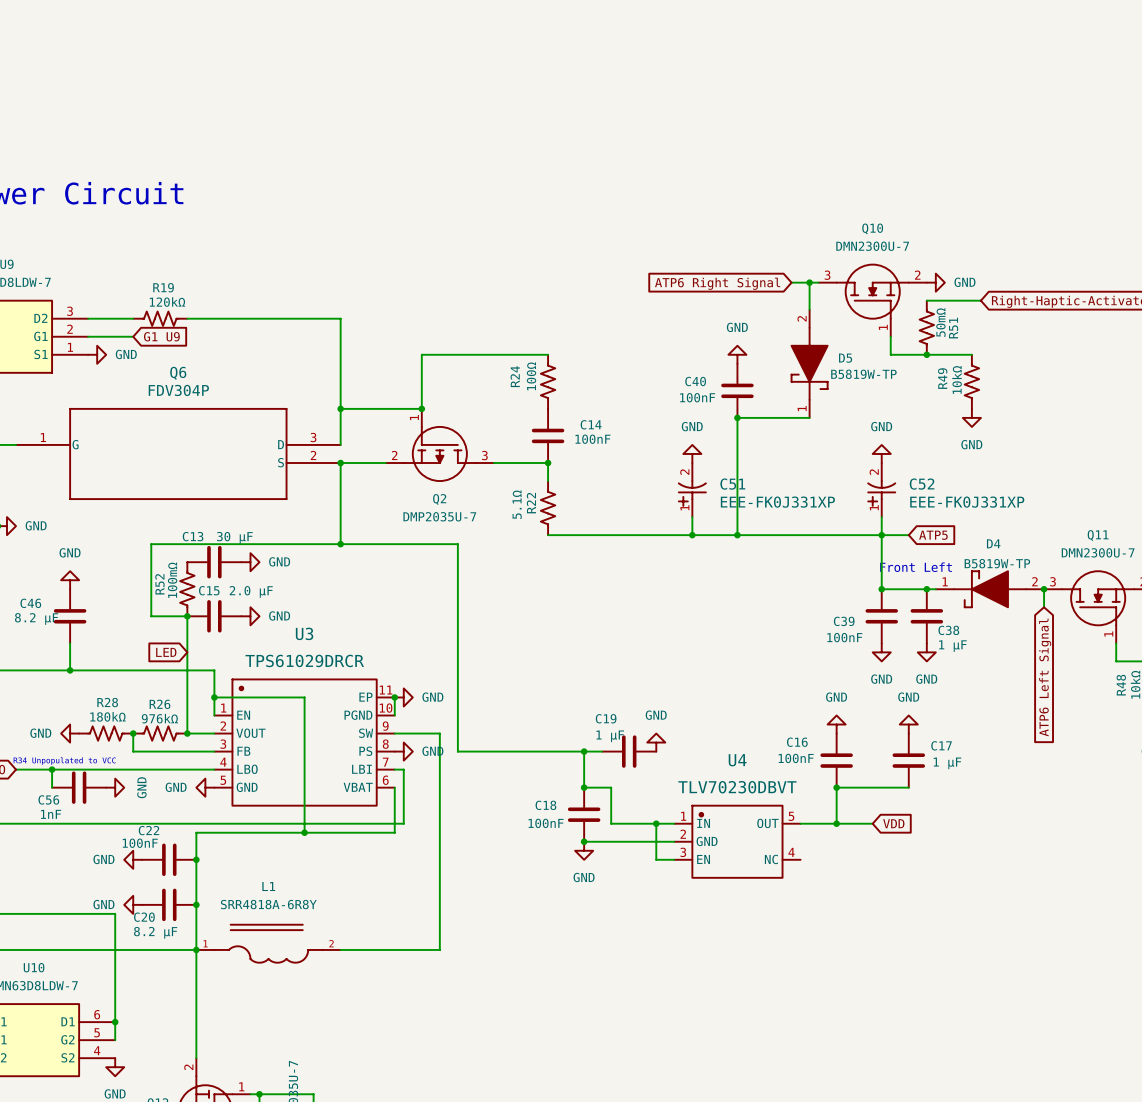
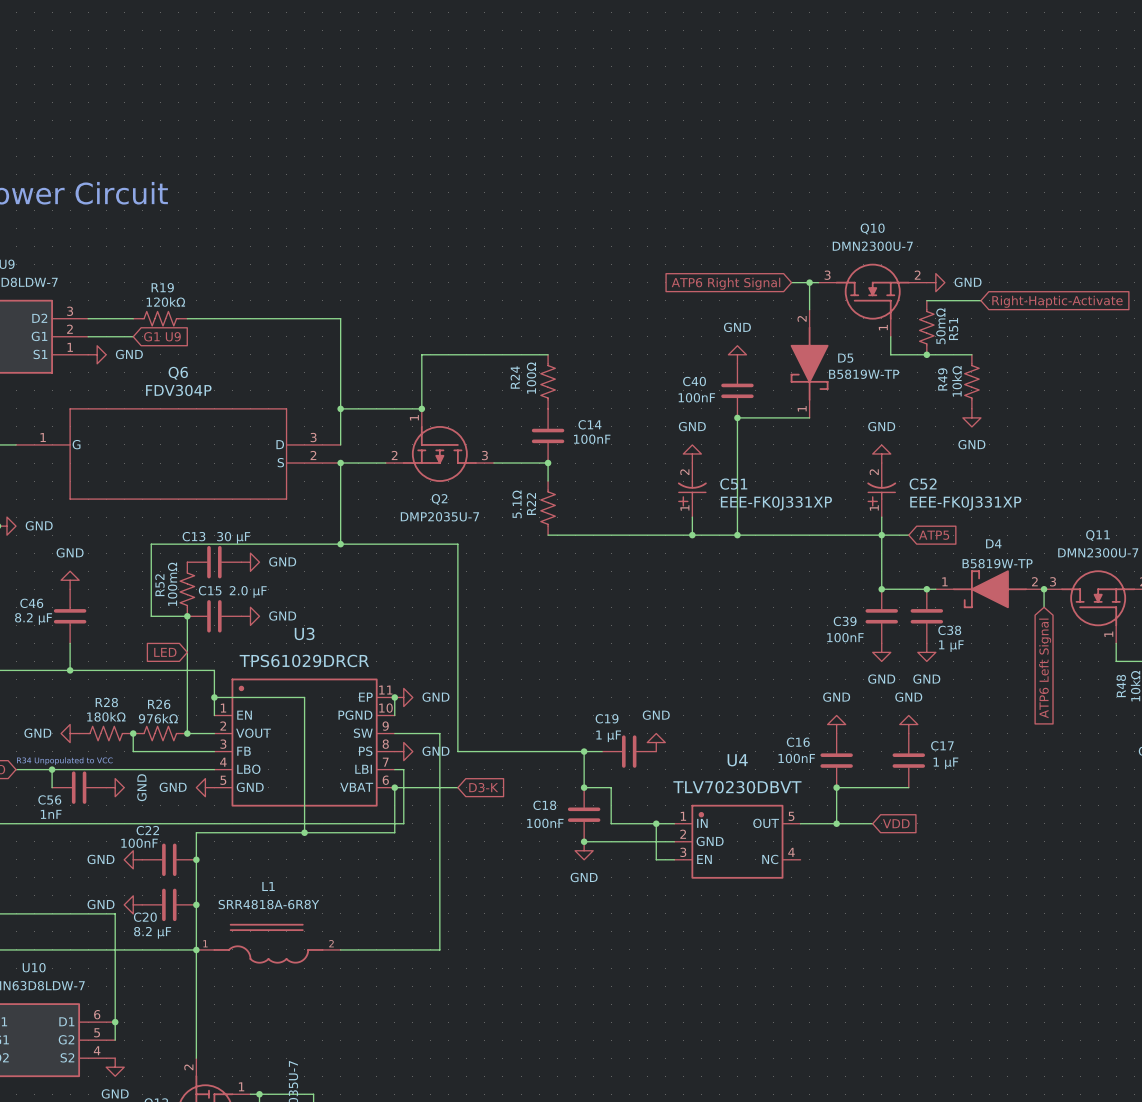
text: Front Left (916, 567) -> none
wire: none -> (394, 787) (457, 787)
junction: none -> (394, 787)
global label: none -> D3-K (483, 787)

